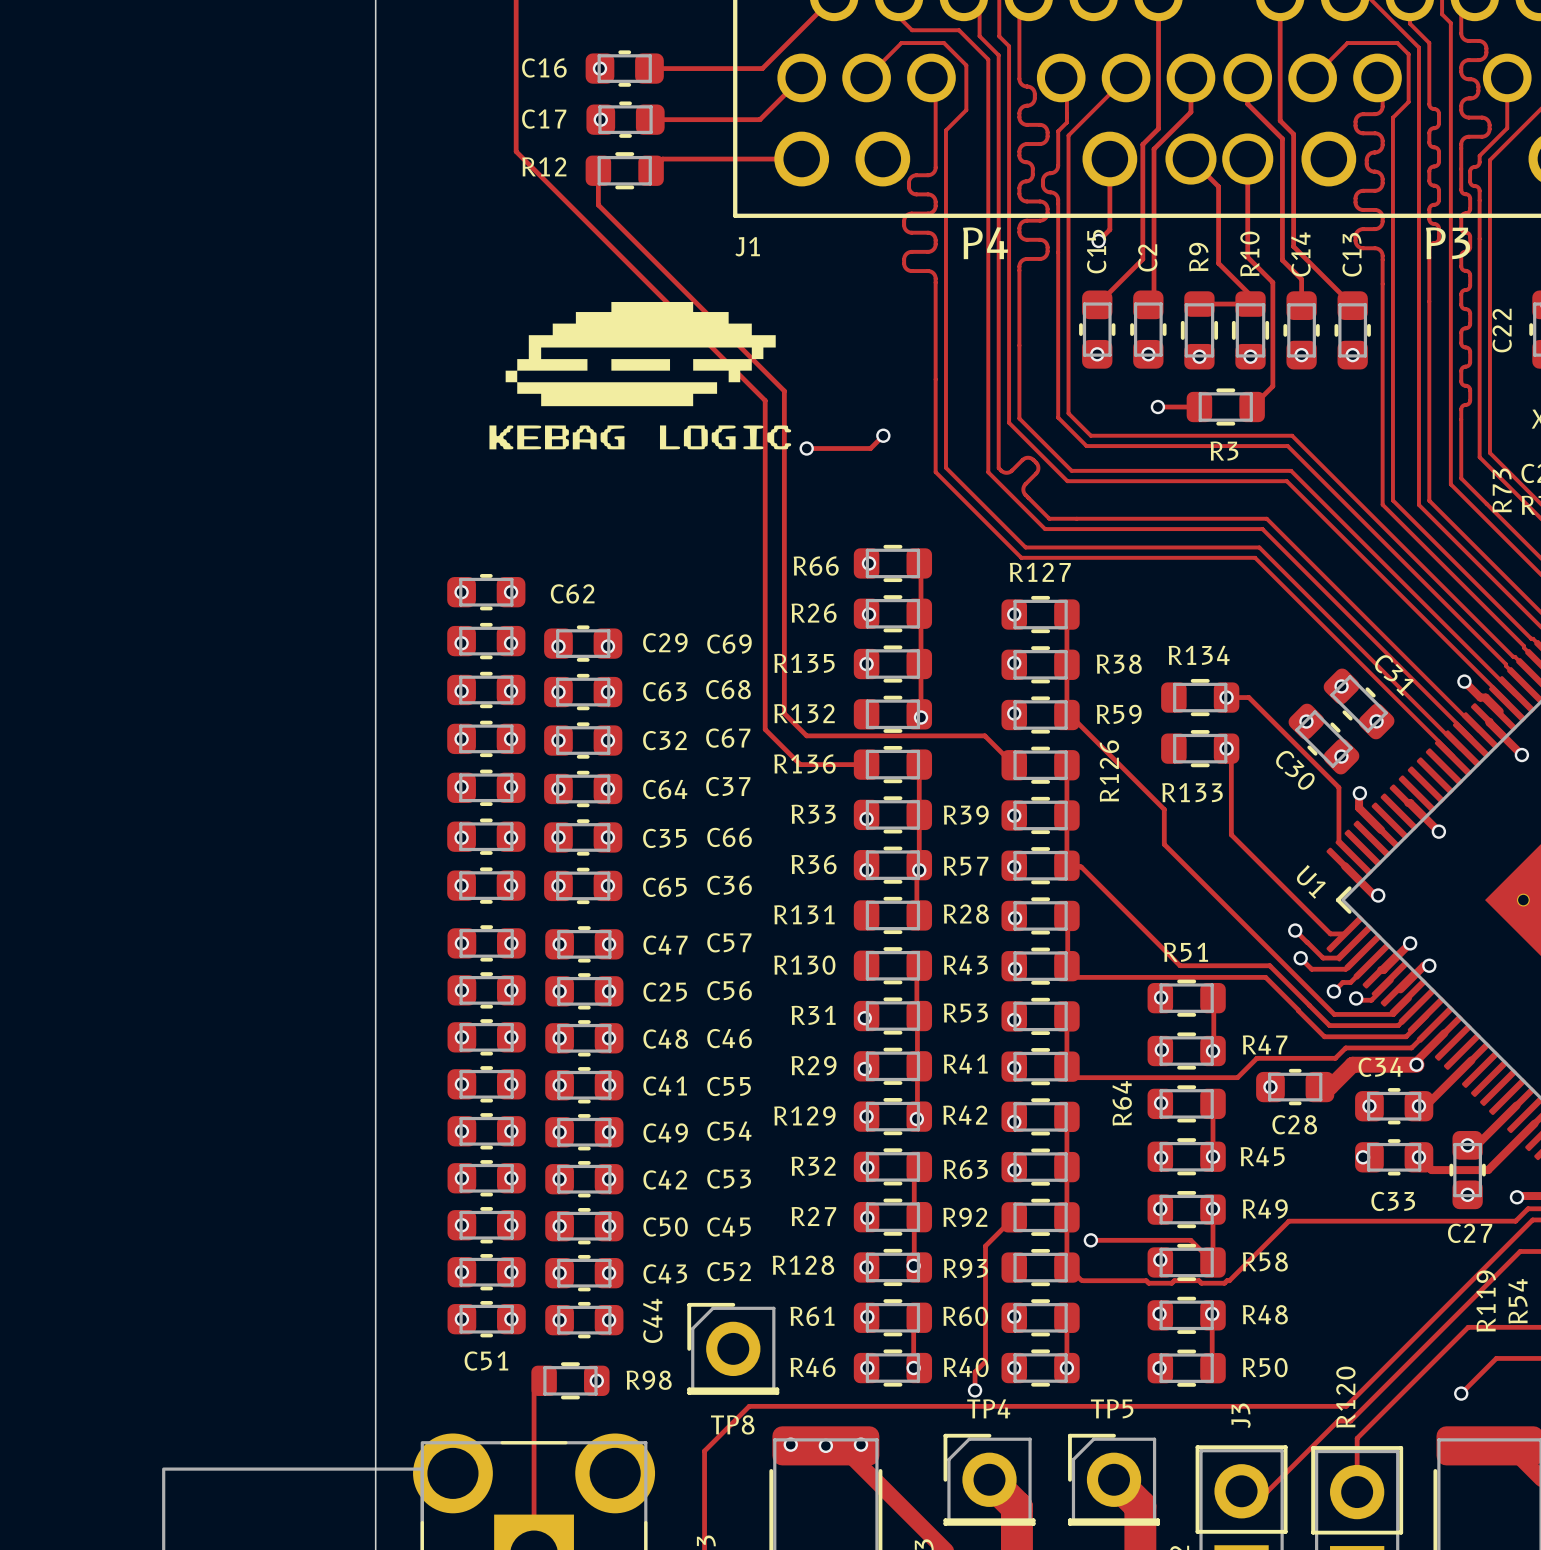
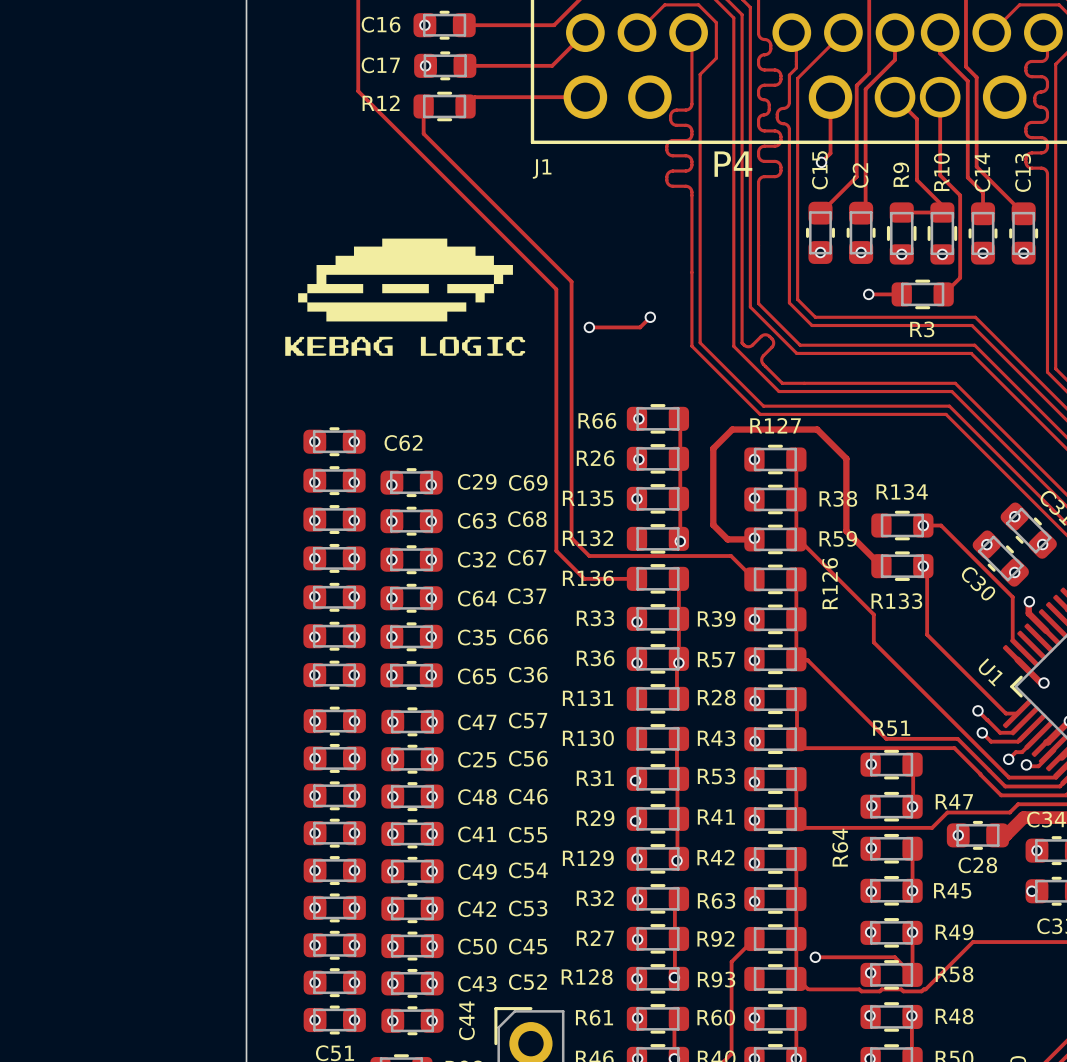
drawing position: (640, 375) -> (405, 297)
track: none -> (754, 539) (727, 539) (713, 525) (713, 448) (732, 429) (817, 429) (846, 458) (846, 531) (881, 566)

